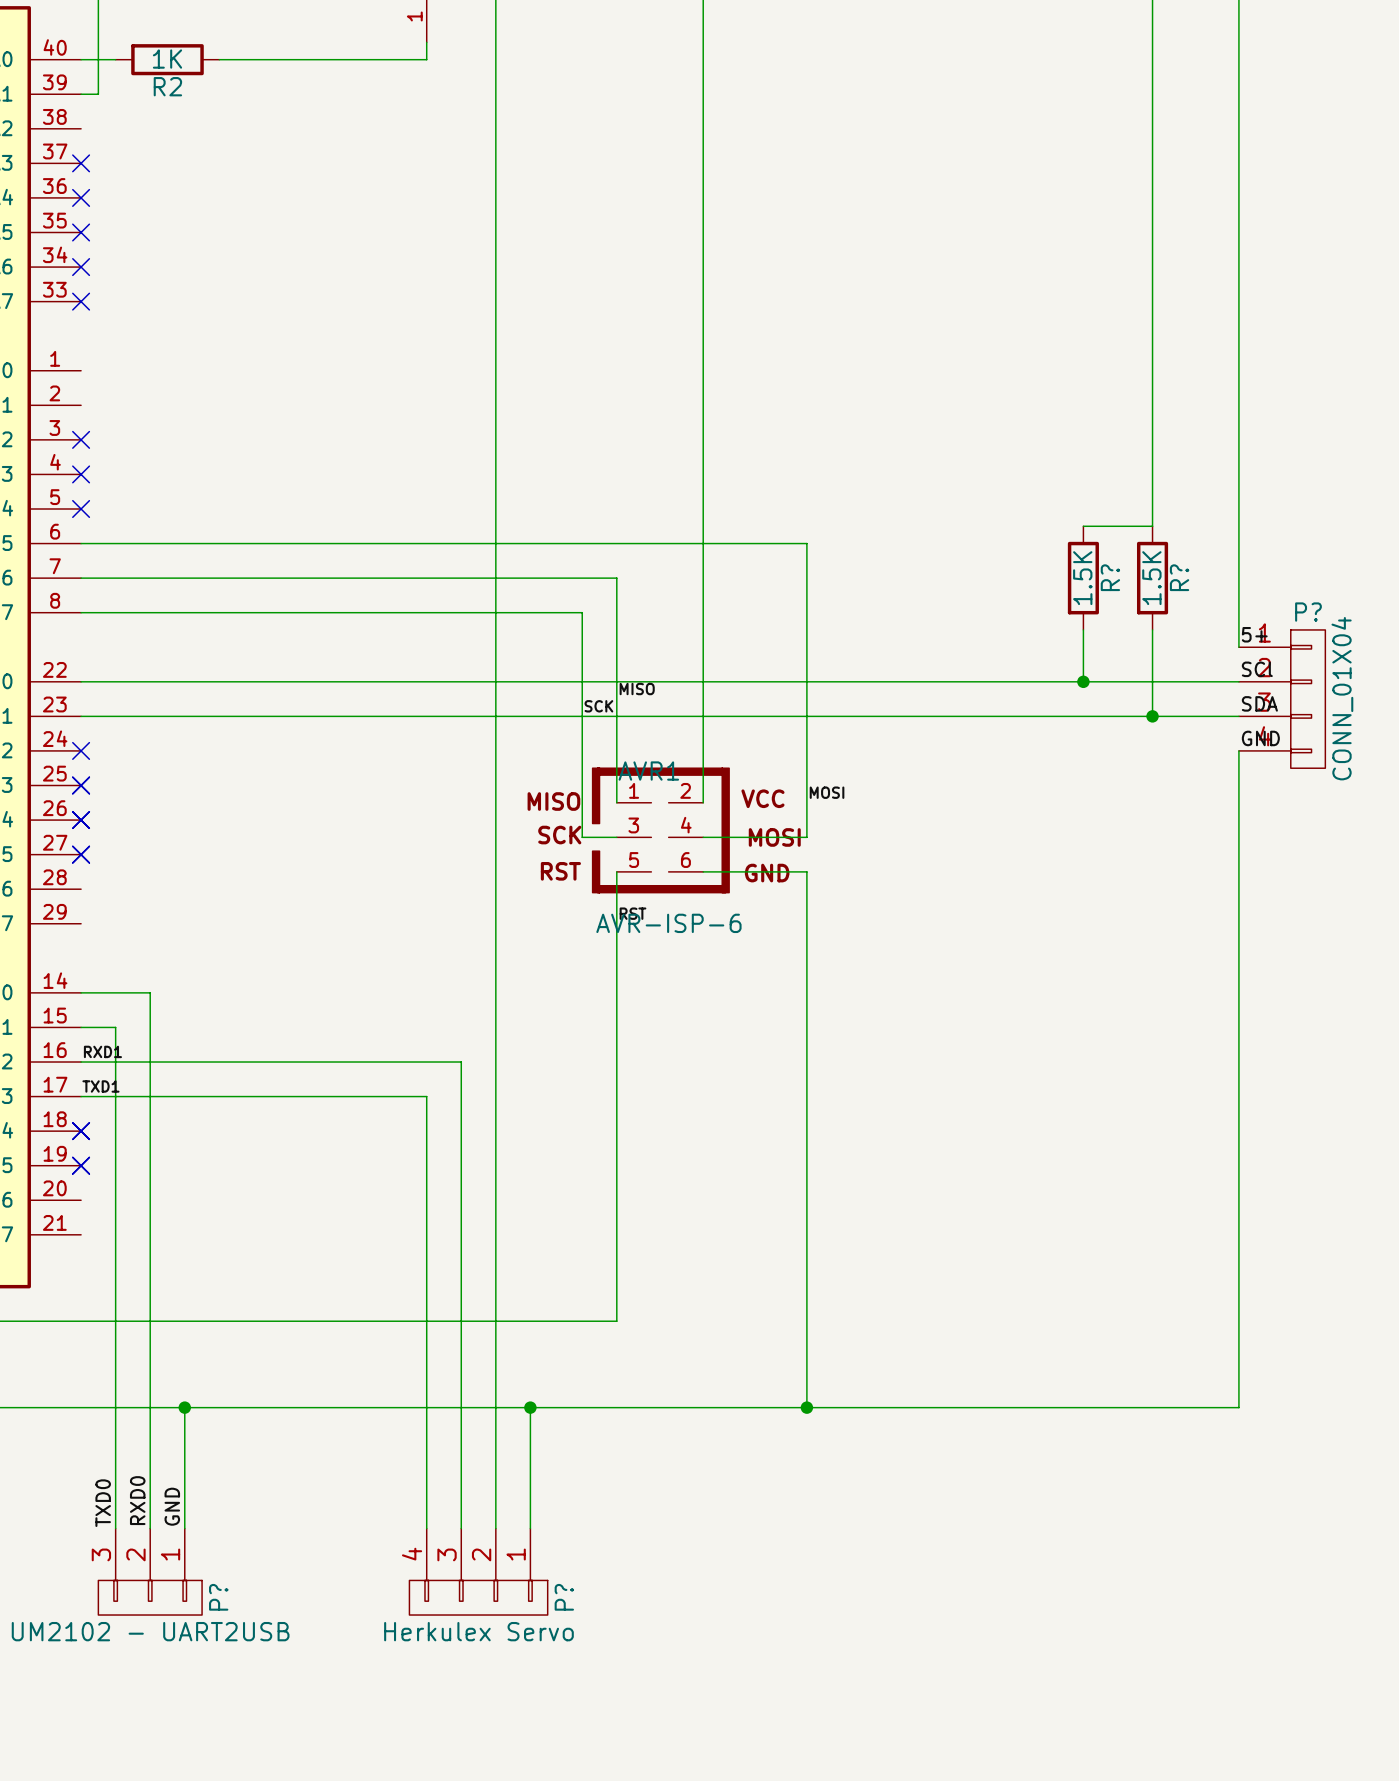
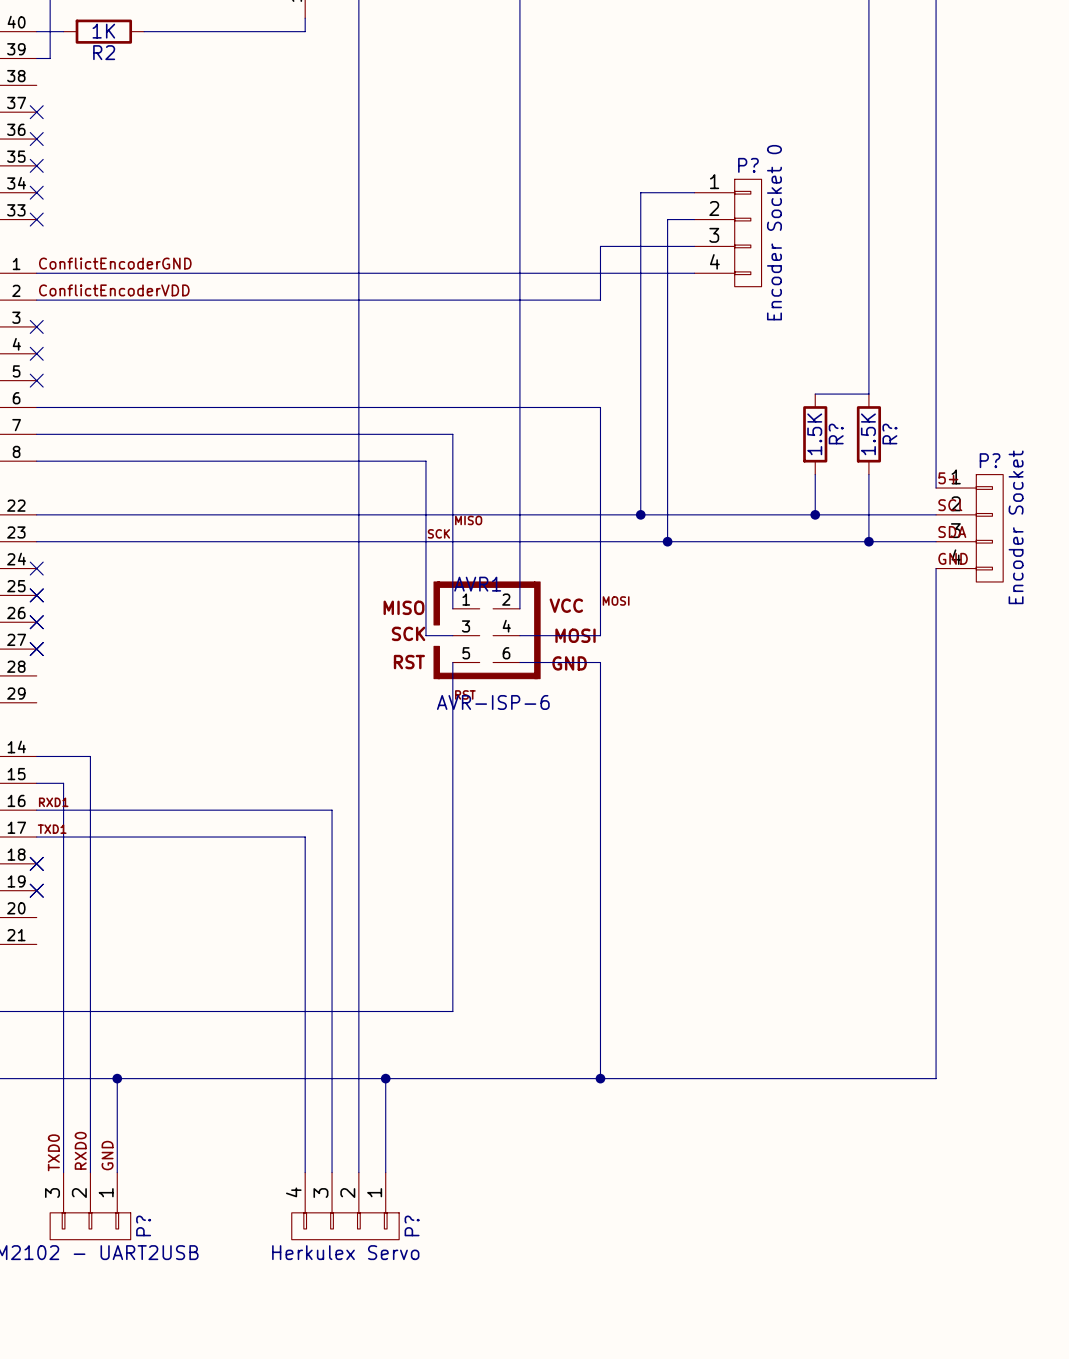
wire: none -> (694, 192) (640, 192) (640, 514)
wire: none -> (694, 219) (667, 219) (667, 541)
P?: none -> Encoder Socket 0 (727, 232)
wire: none -> (694, 246) (600, 246) (600, 300) (36, 300)
label: none -> ConflictEncoderGND (115, 263)
wire: none -> (36, 273) (694, 273)
label: none -> ConflictEncoderVDD (114, 290)
junction: none -> (640, 514)
P? value: CONN_01X04 (1342, 698) -> Encoder Socket (1016, 527)
junction: none -> (667, 541)

